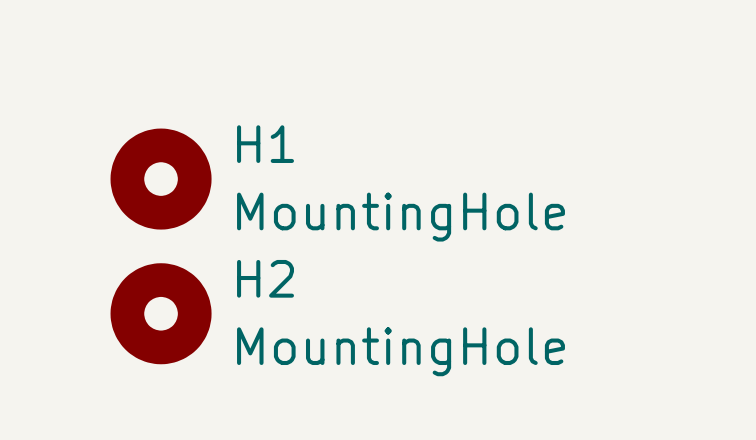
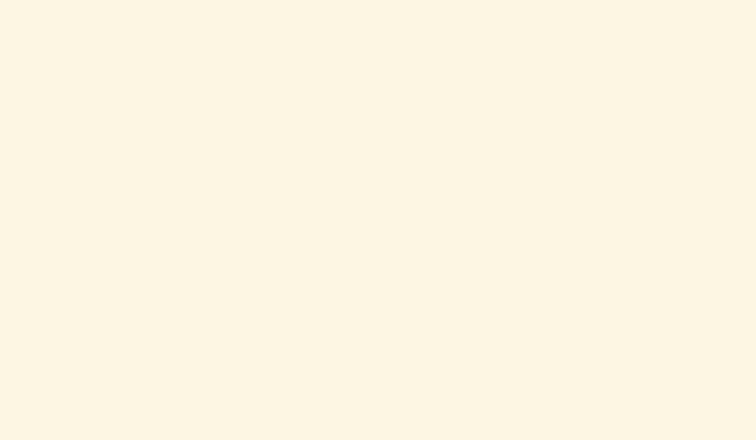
H1: MountingHole (161, 179) -> none
H2: MountingHole (161, 313) -> none

